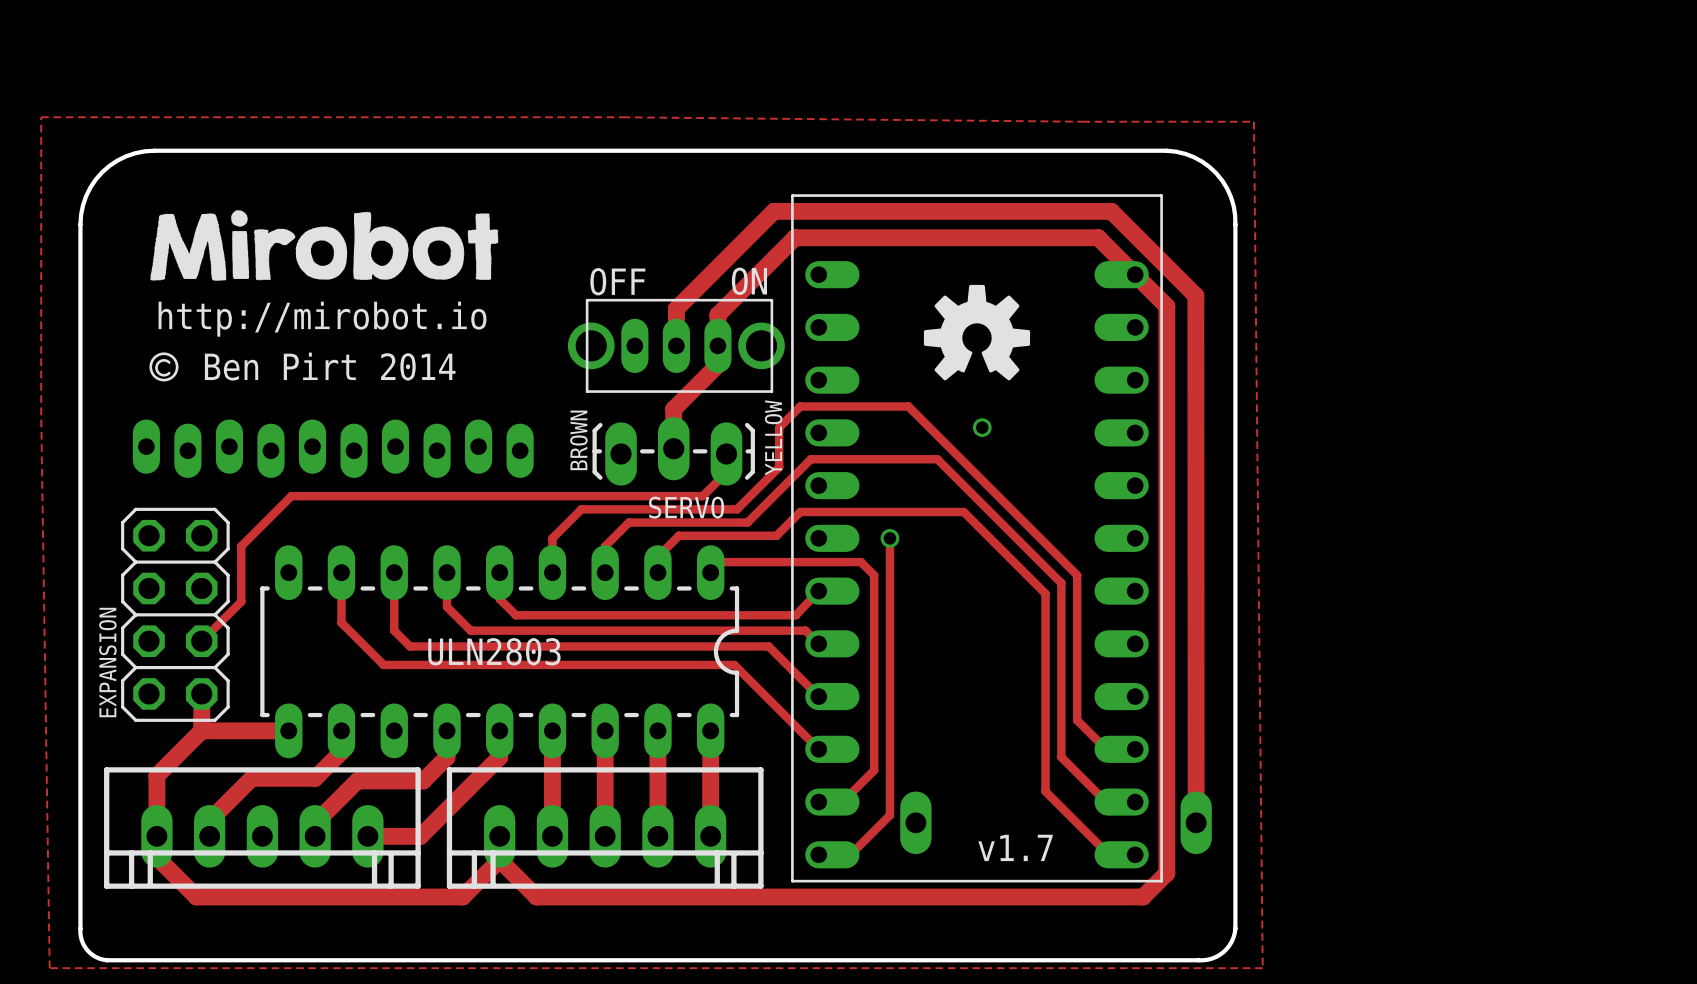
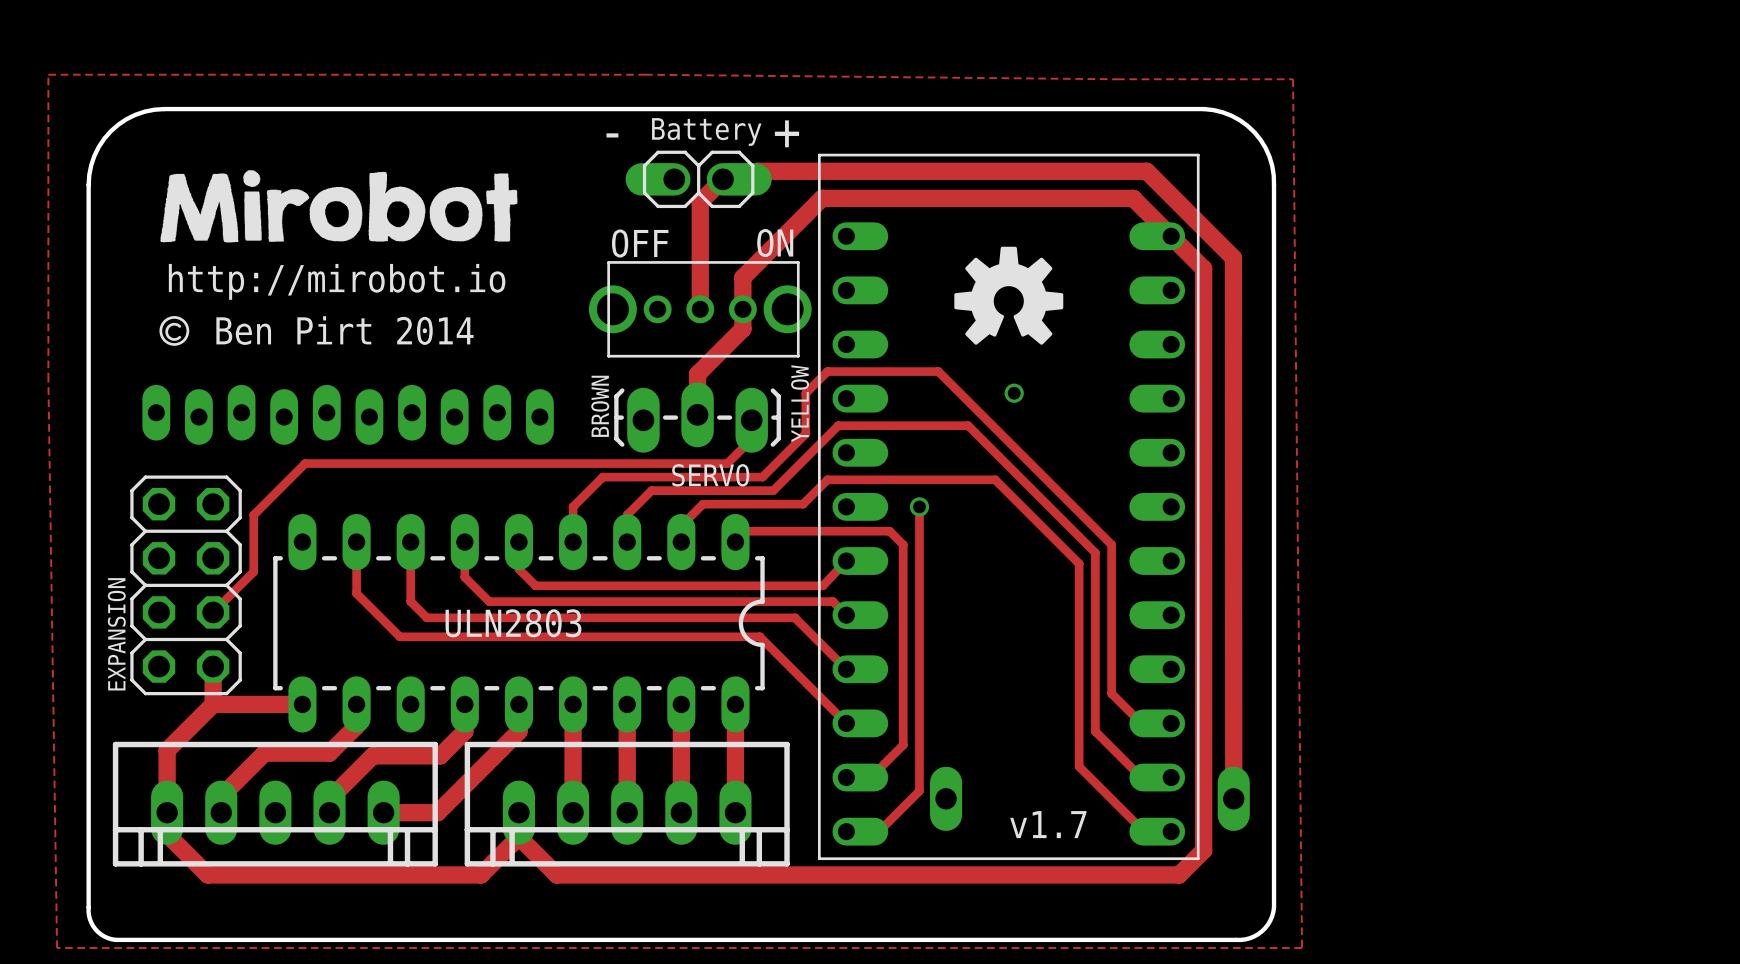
text: none -> + (786, 133)
text: none -> - (612, 135)
track: (773, 211) (676, 308) -> (800, 171) (757, 171) (754, 179) (723, 179) (700, 202) (700, 271)
part: none -> Battery (698, 179)
part footprint: [567, 298, 785, 393] -> [588, 261, 812, 358]

